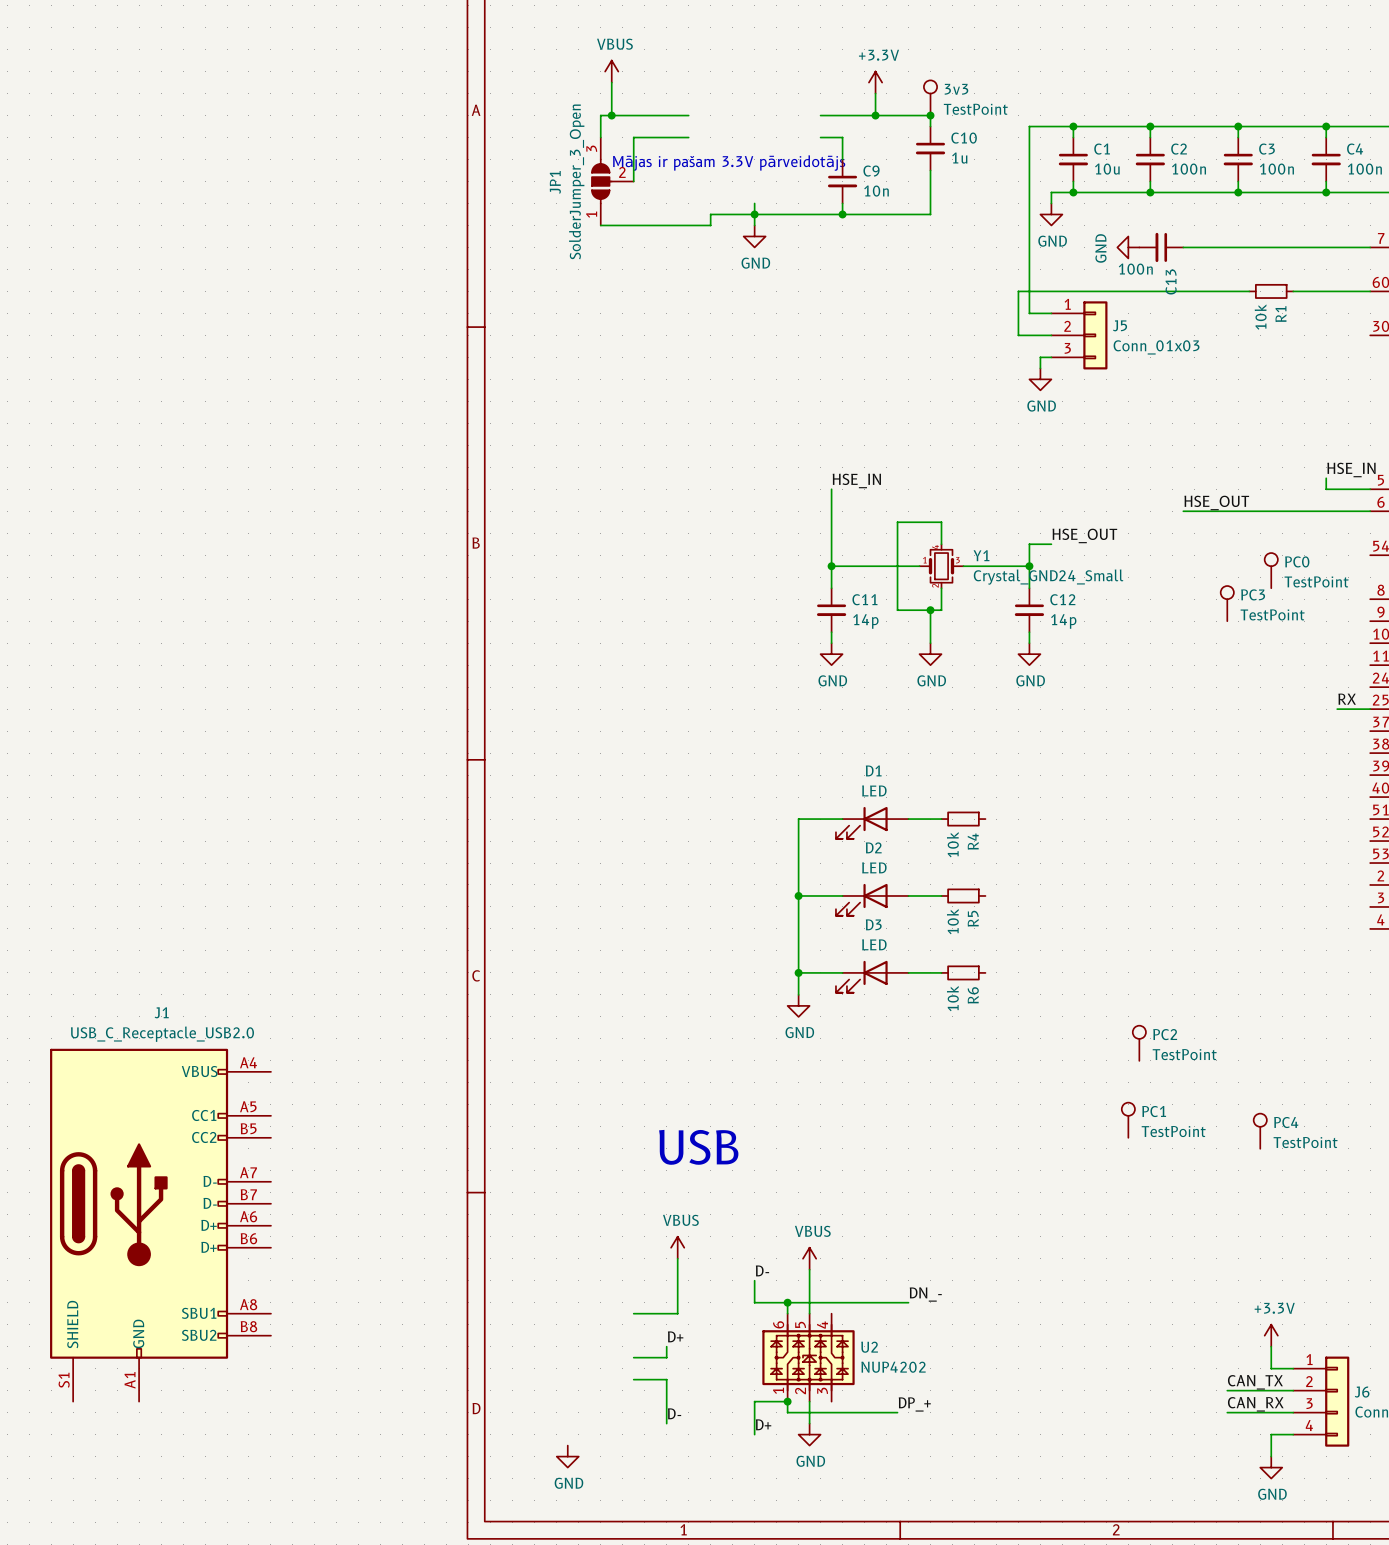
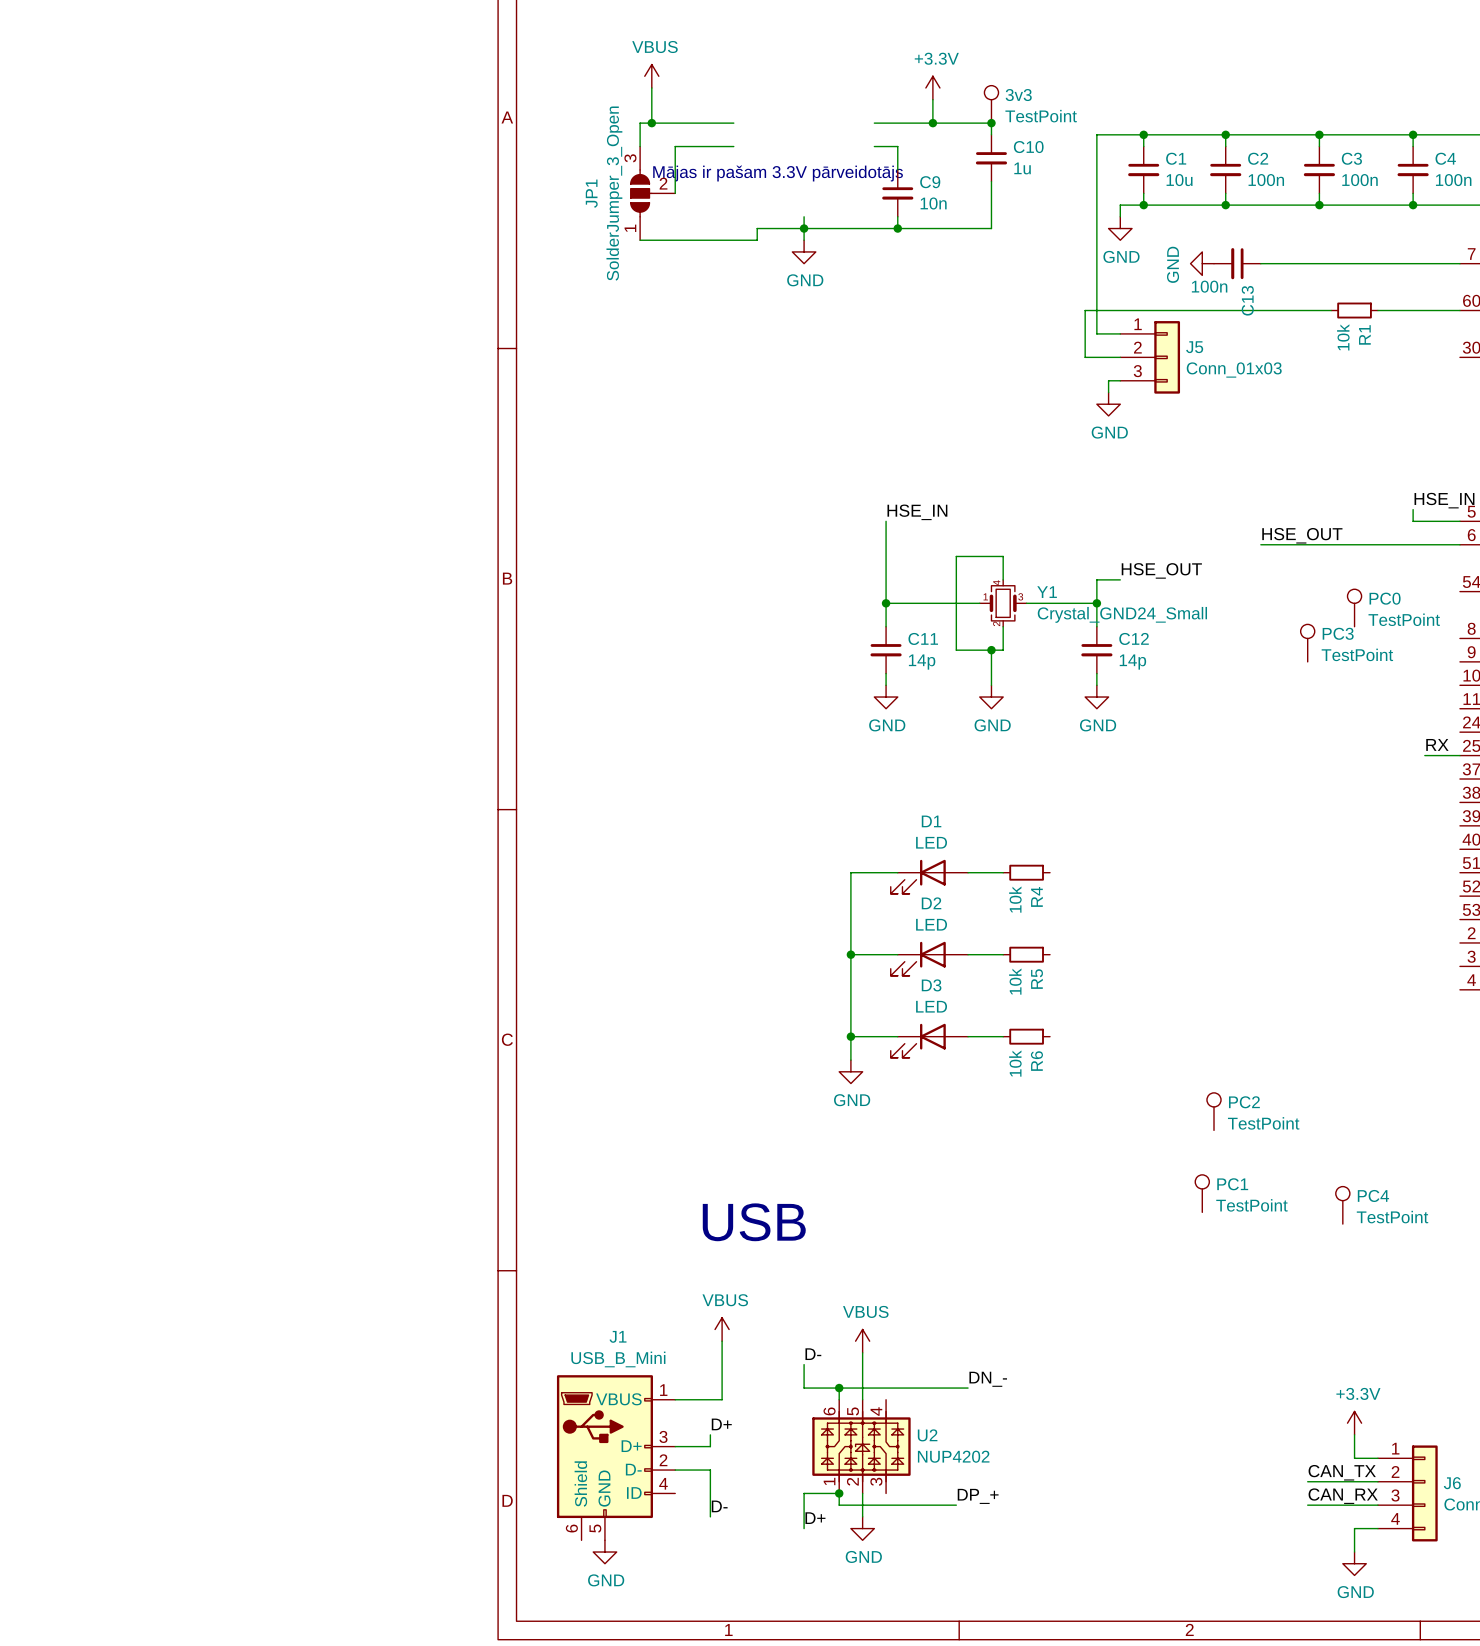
J1 name position: J1 (161, 1012) -> J1 (618, 1336)
J1 value: USB_C_Receptacle_USB2.0 (162, 1034) -> USB_B_Mini (618, 1359)
J1 symbol: [50, 1048, 271, 1402] -> [556, 1375, 676, 1541]

